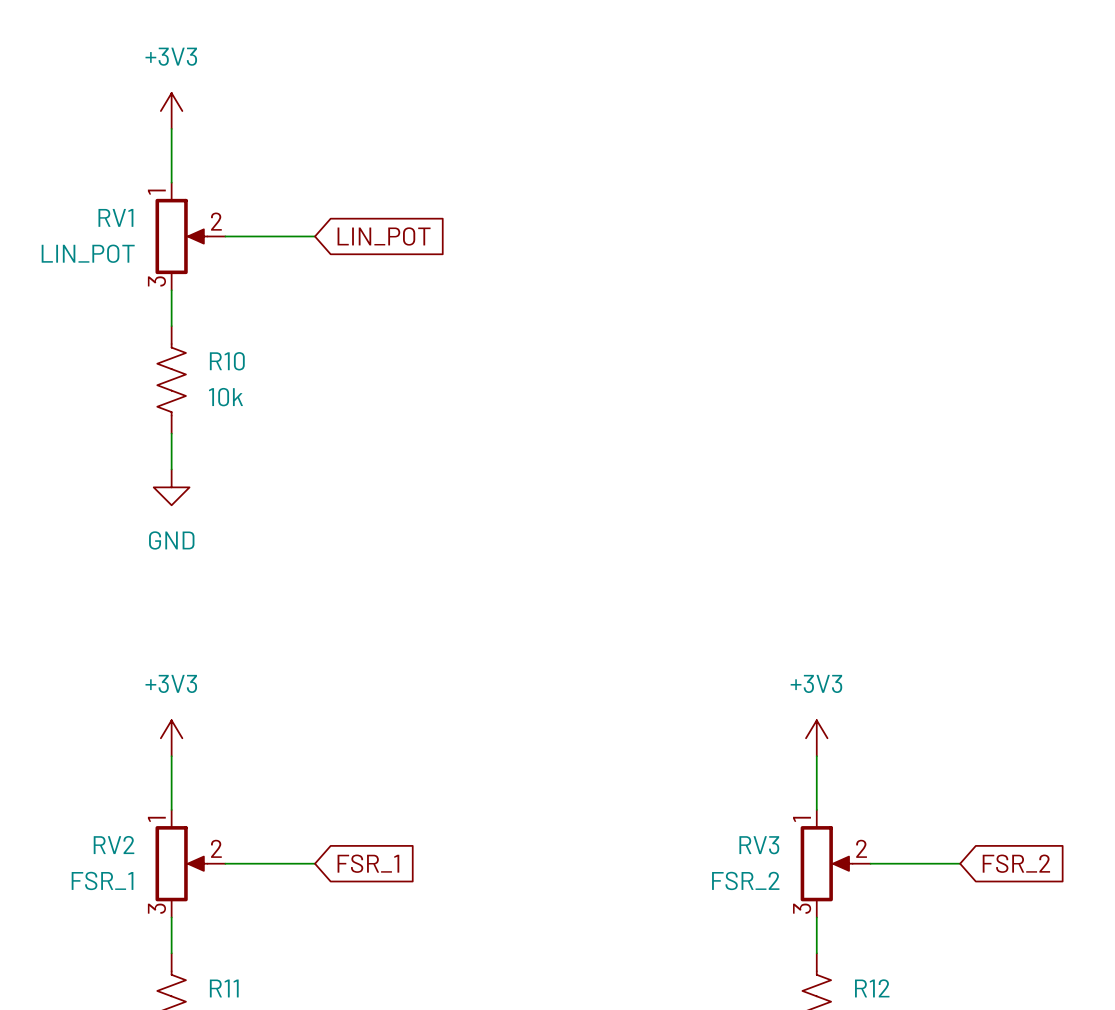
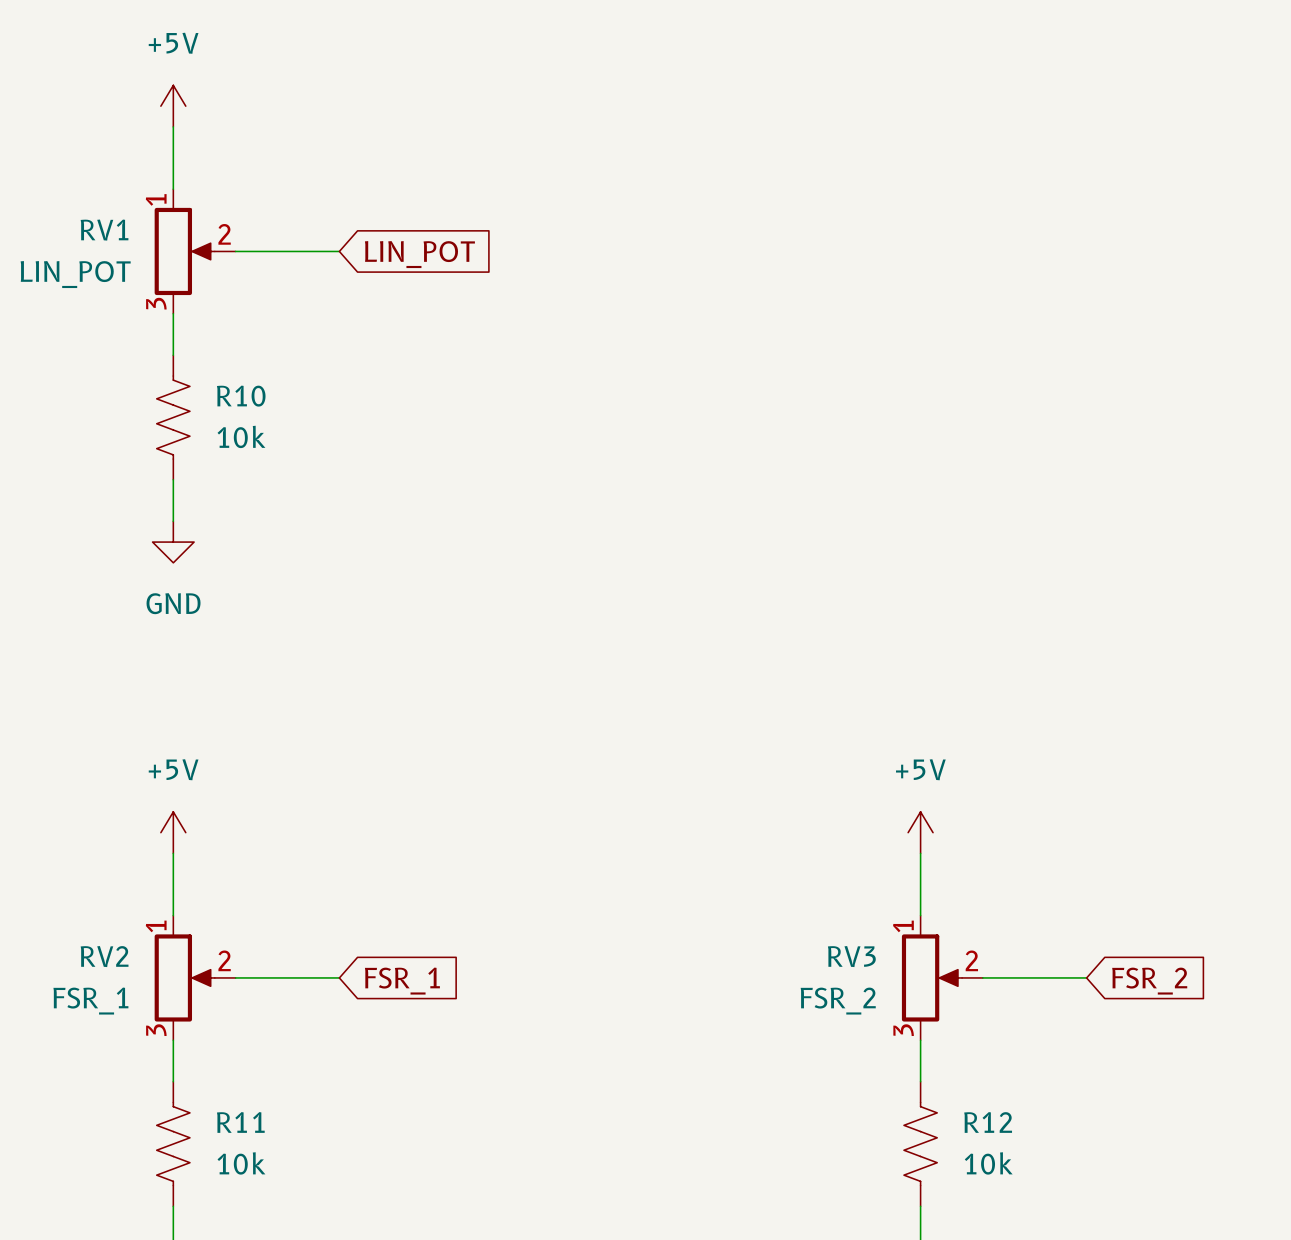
power symbol: +3V3 (171, 111) -> +5V (173, 106)
power symbol: +3V3 (171, 738) -> +5V (173, 832)
power symbol: +3V3 (816, 738) -> +5V (920, 832)

